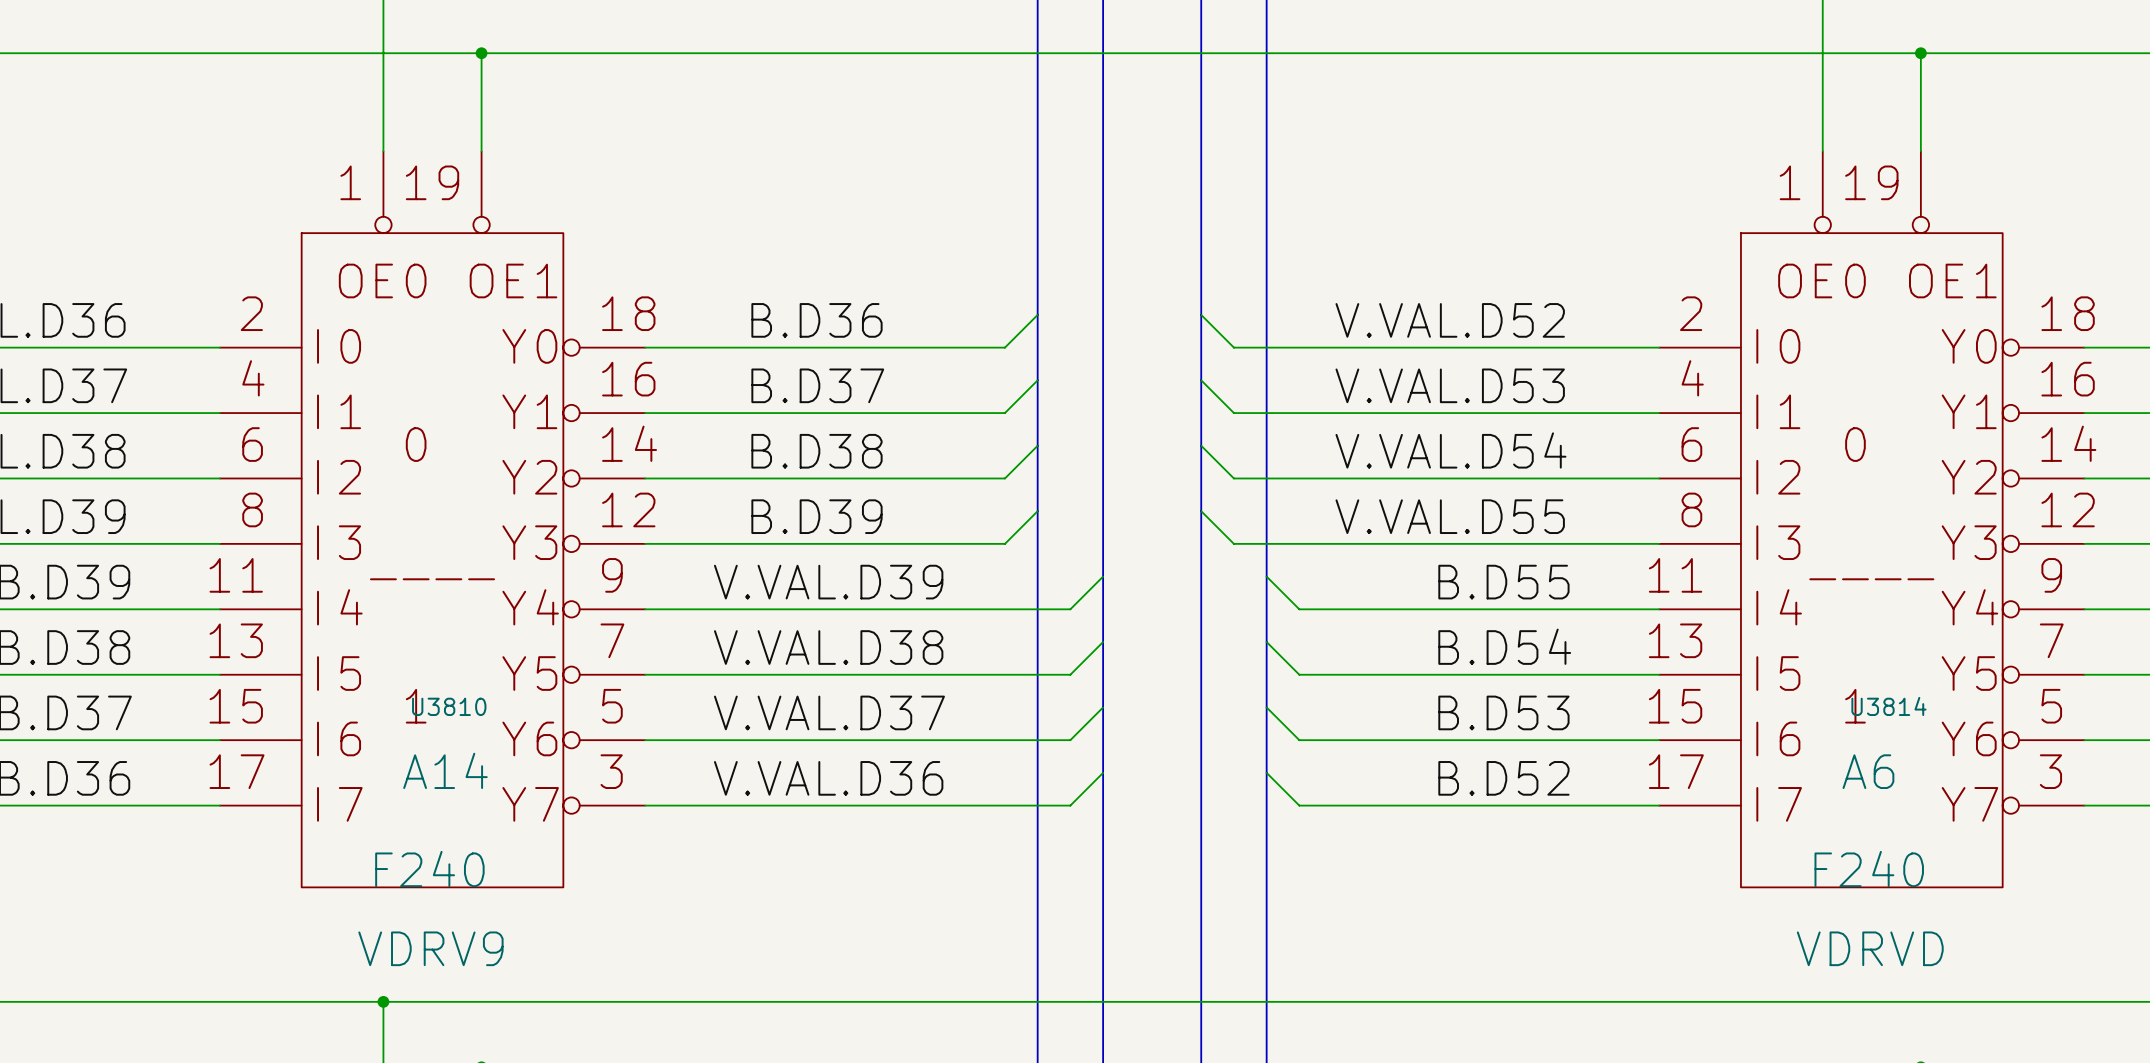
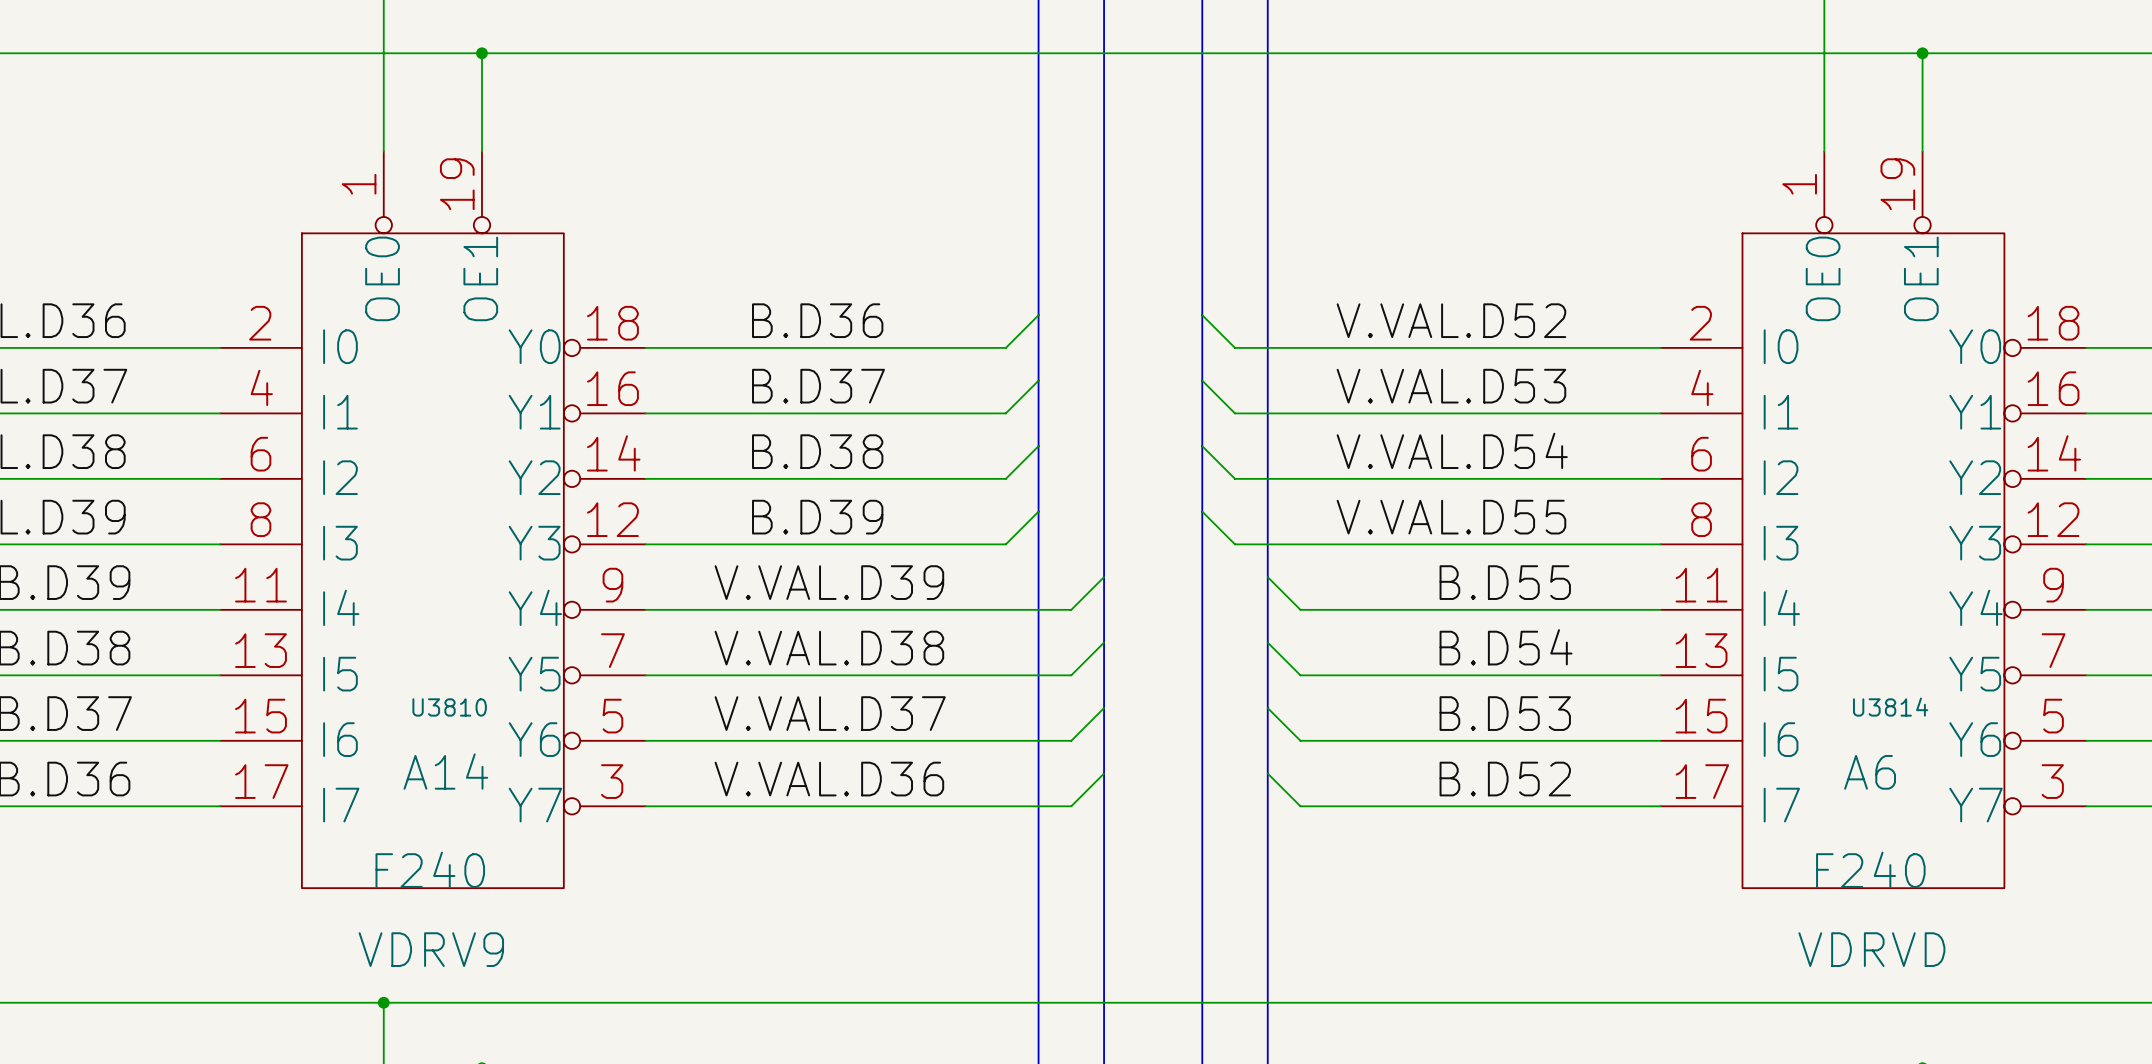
U3810 symbol: [219, 151, 646, 888] -> [220, 151, 646, 889]
U3814 symbol: [1659, 151, 2085, 888] -> [1660, 151, 2087, 889]

